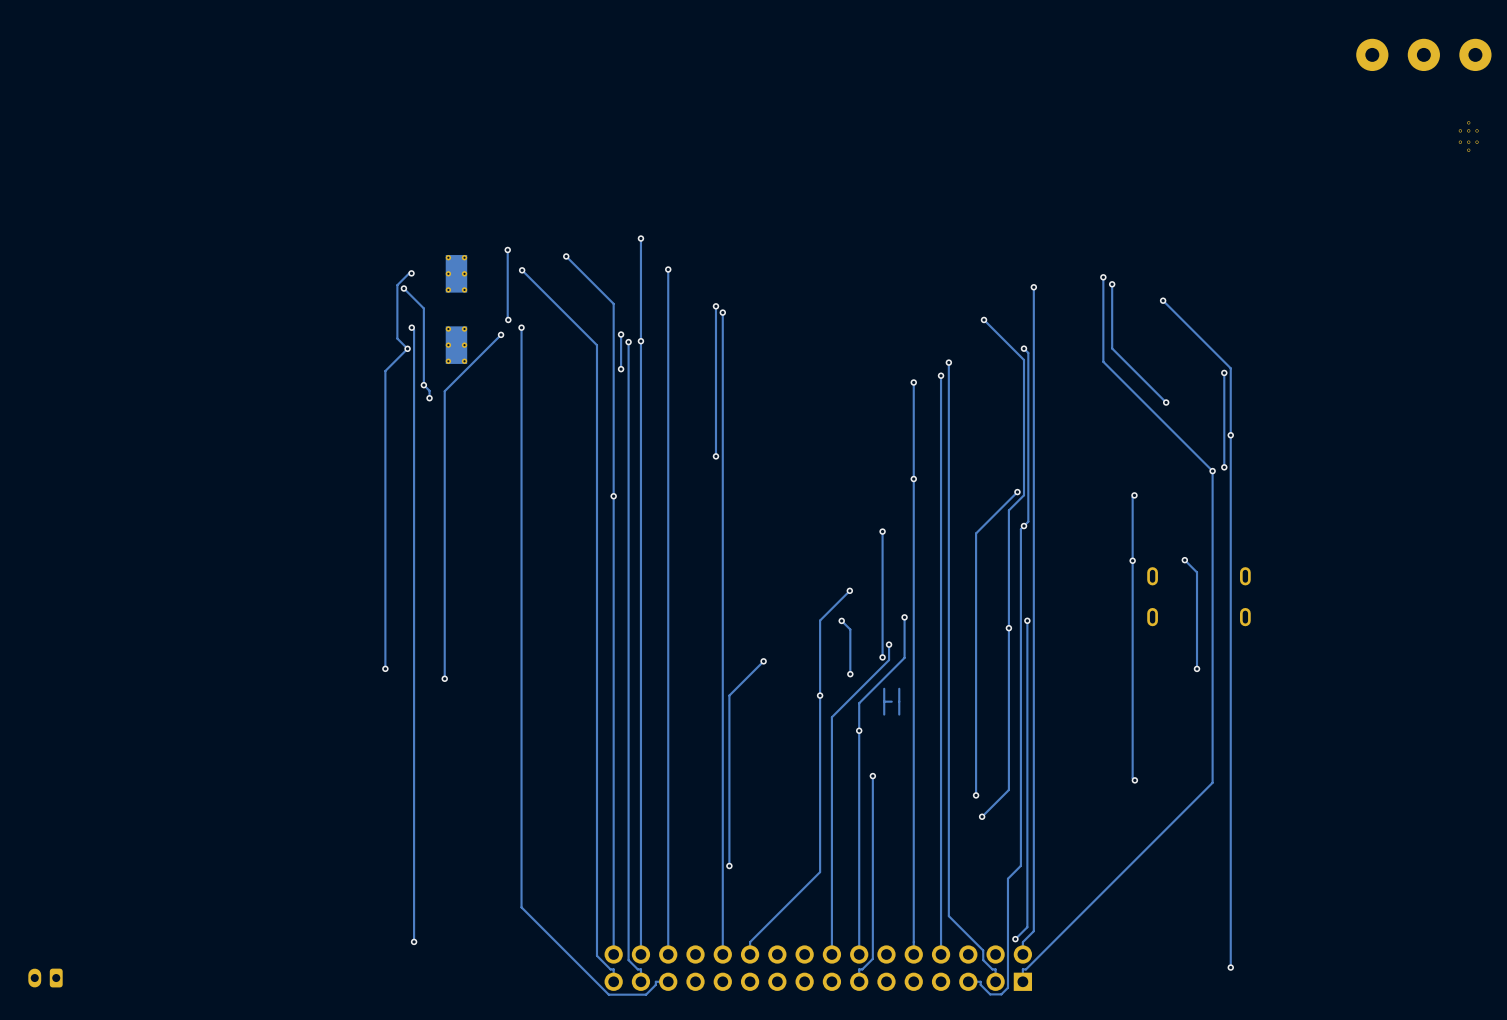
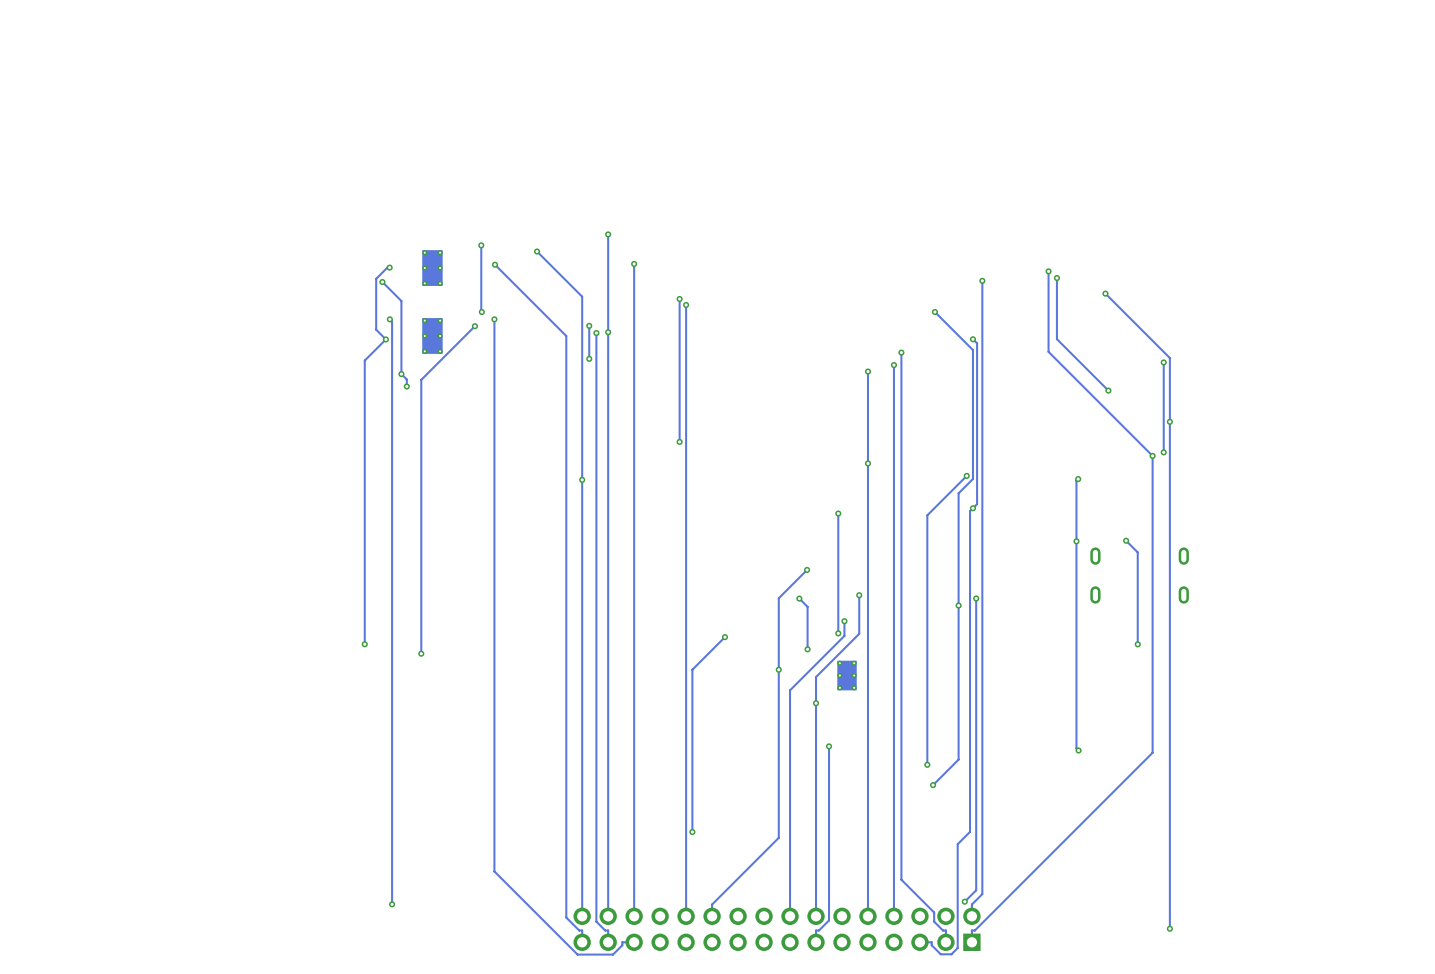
part: (1423, 54) -> none
part: (1468, 136) -> none
part: none -> (847, 675)
part: (45, 978) -> none

